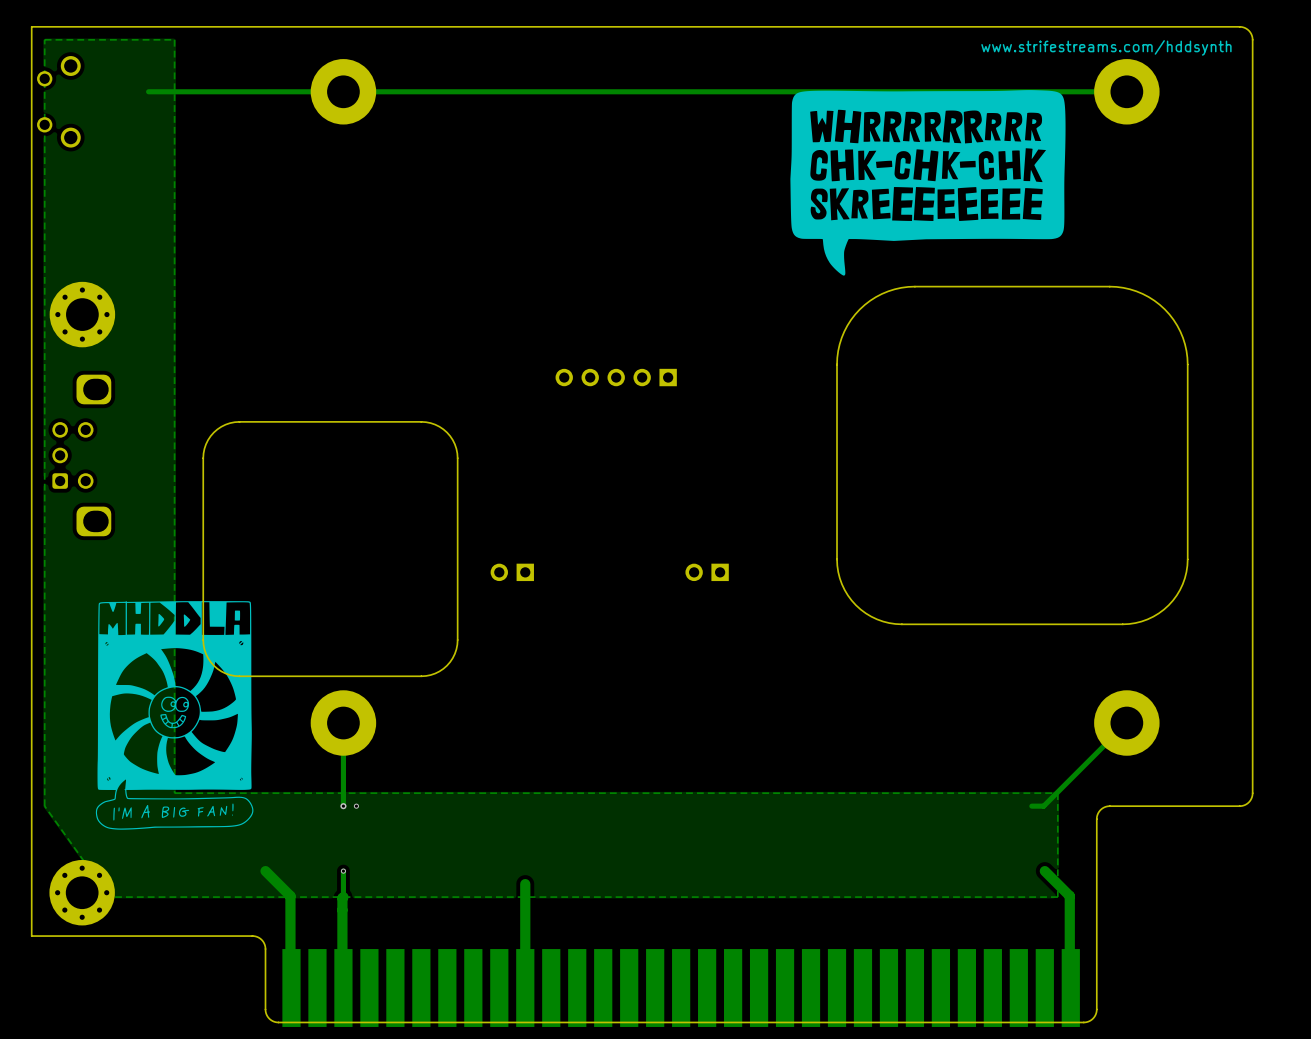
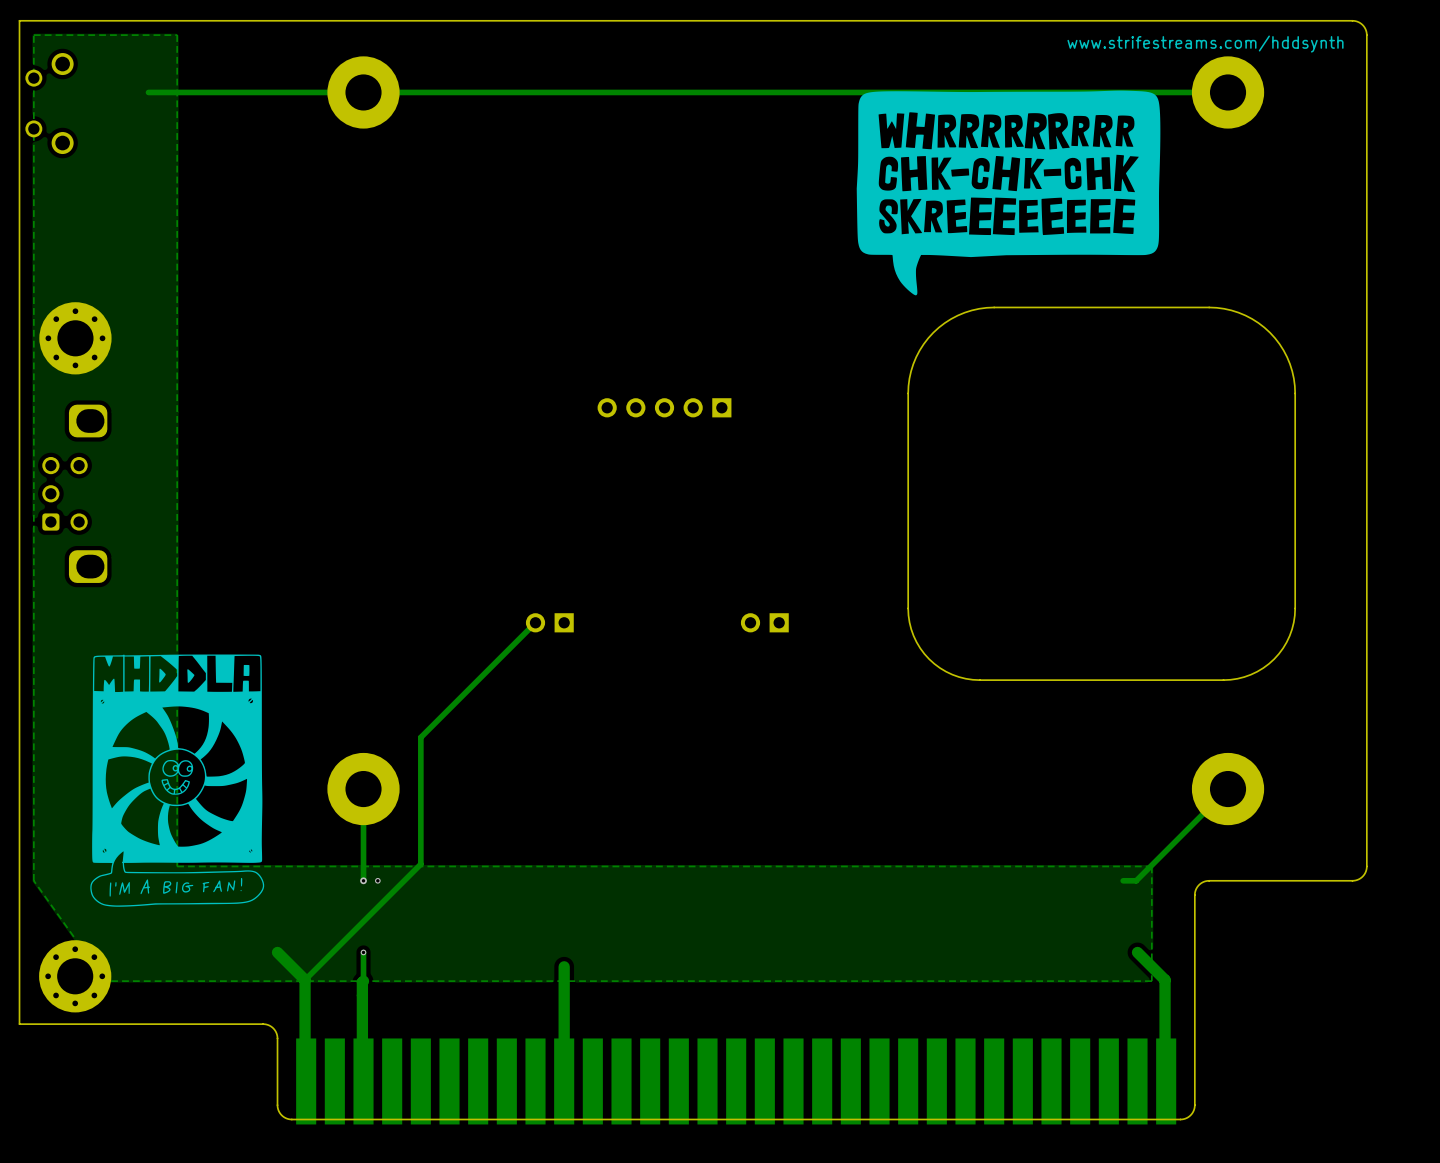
board edge: (421, 421) (234, 422) (221, 426) (210, 436) (206, 444) (203, 458) (203, 640) (208, 658) (217, 668) (230, 675) (239, 676) (421, 676) (439, 671) (450, 662) (454, 653) (457, 640) (457, 453) (452, 440) (443, 429) (430, 423) (421, 421) -> none
track: none -> (535, 622) (420, 737) (420, 864) (305, 980)

